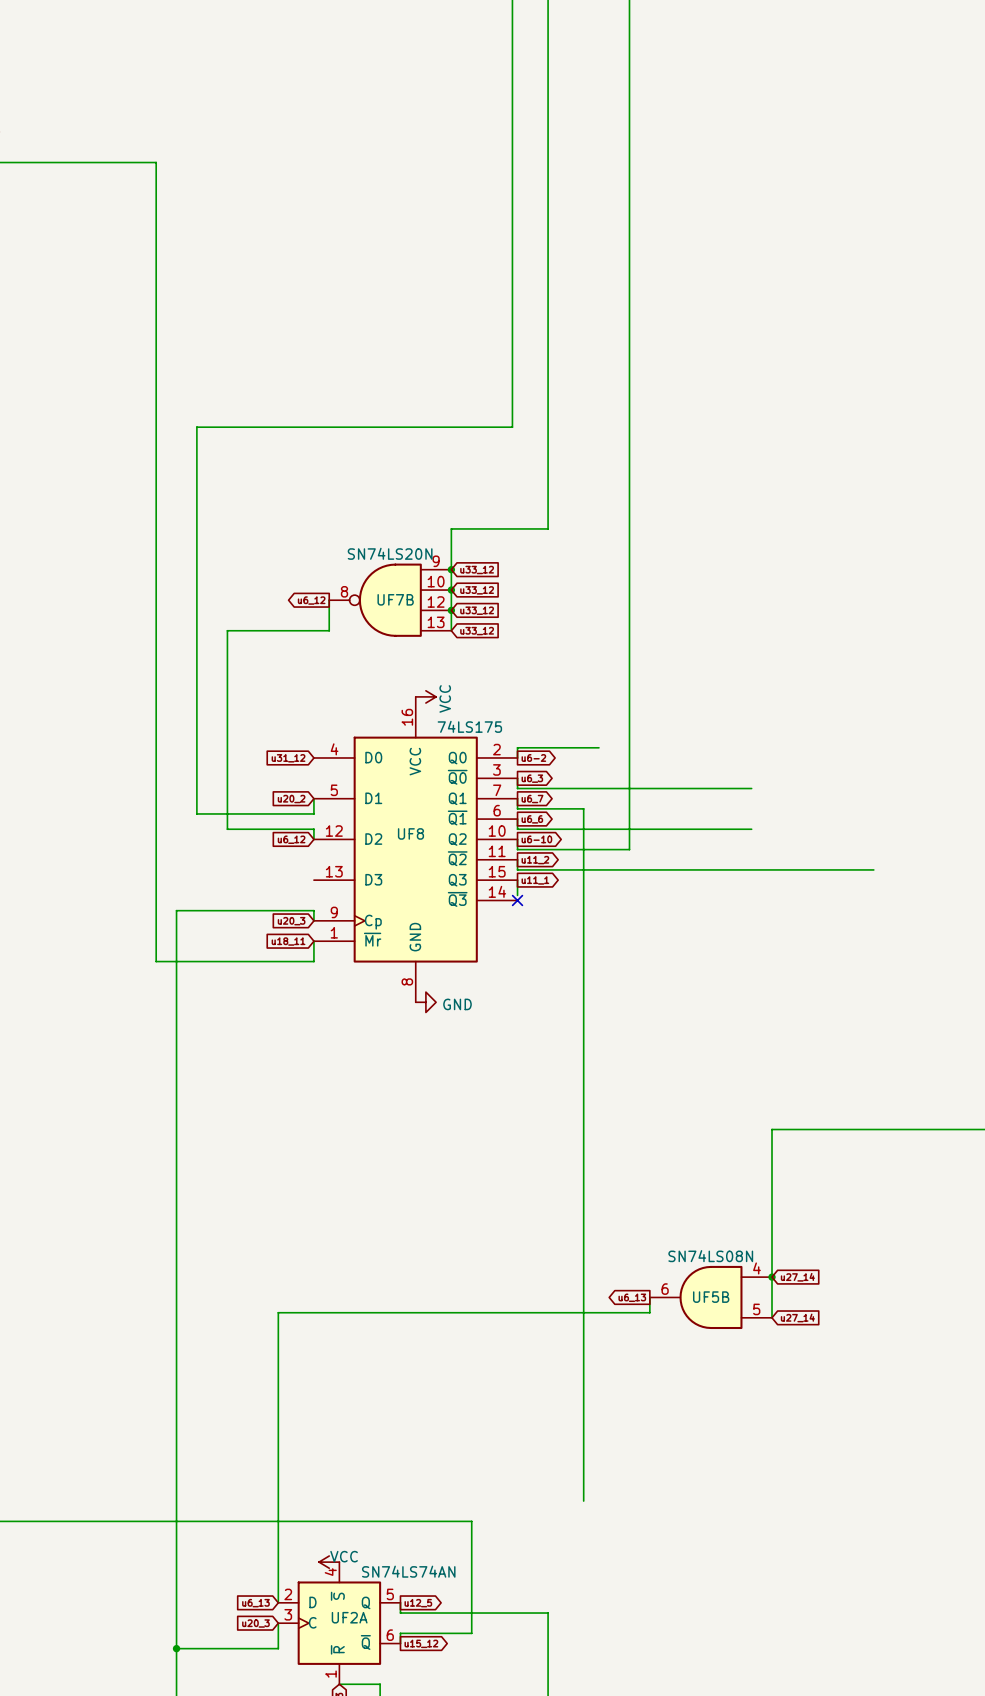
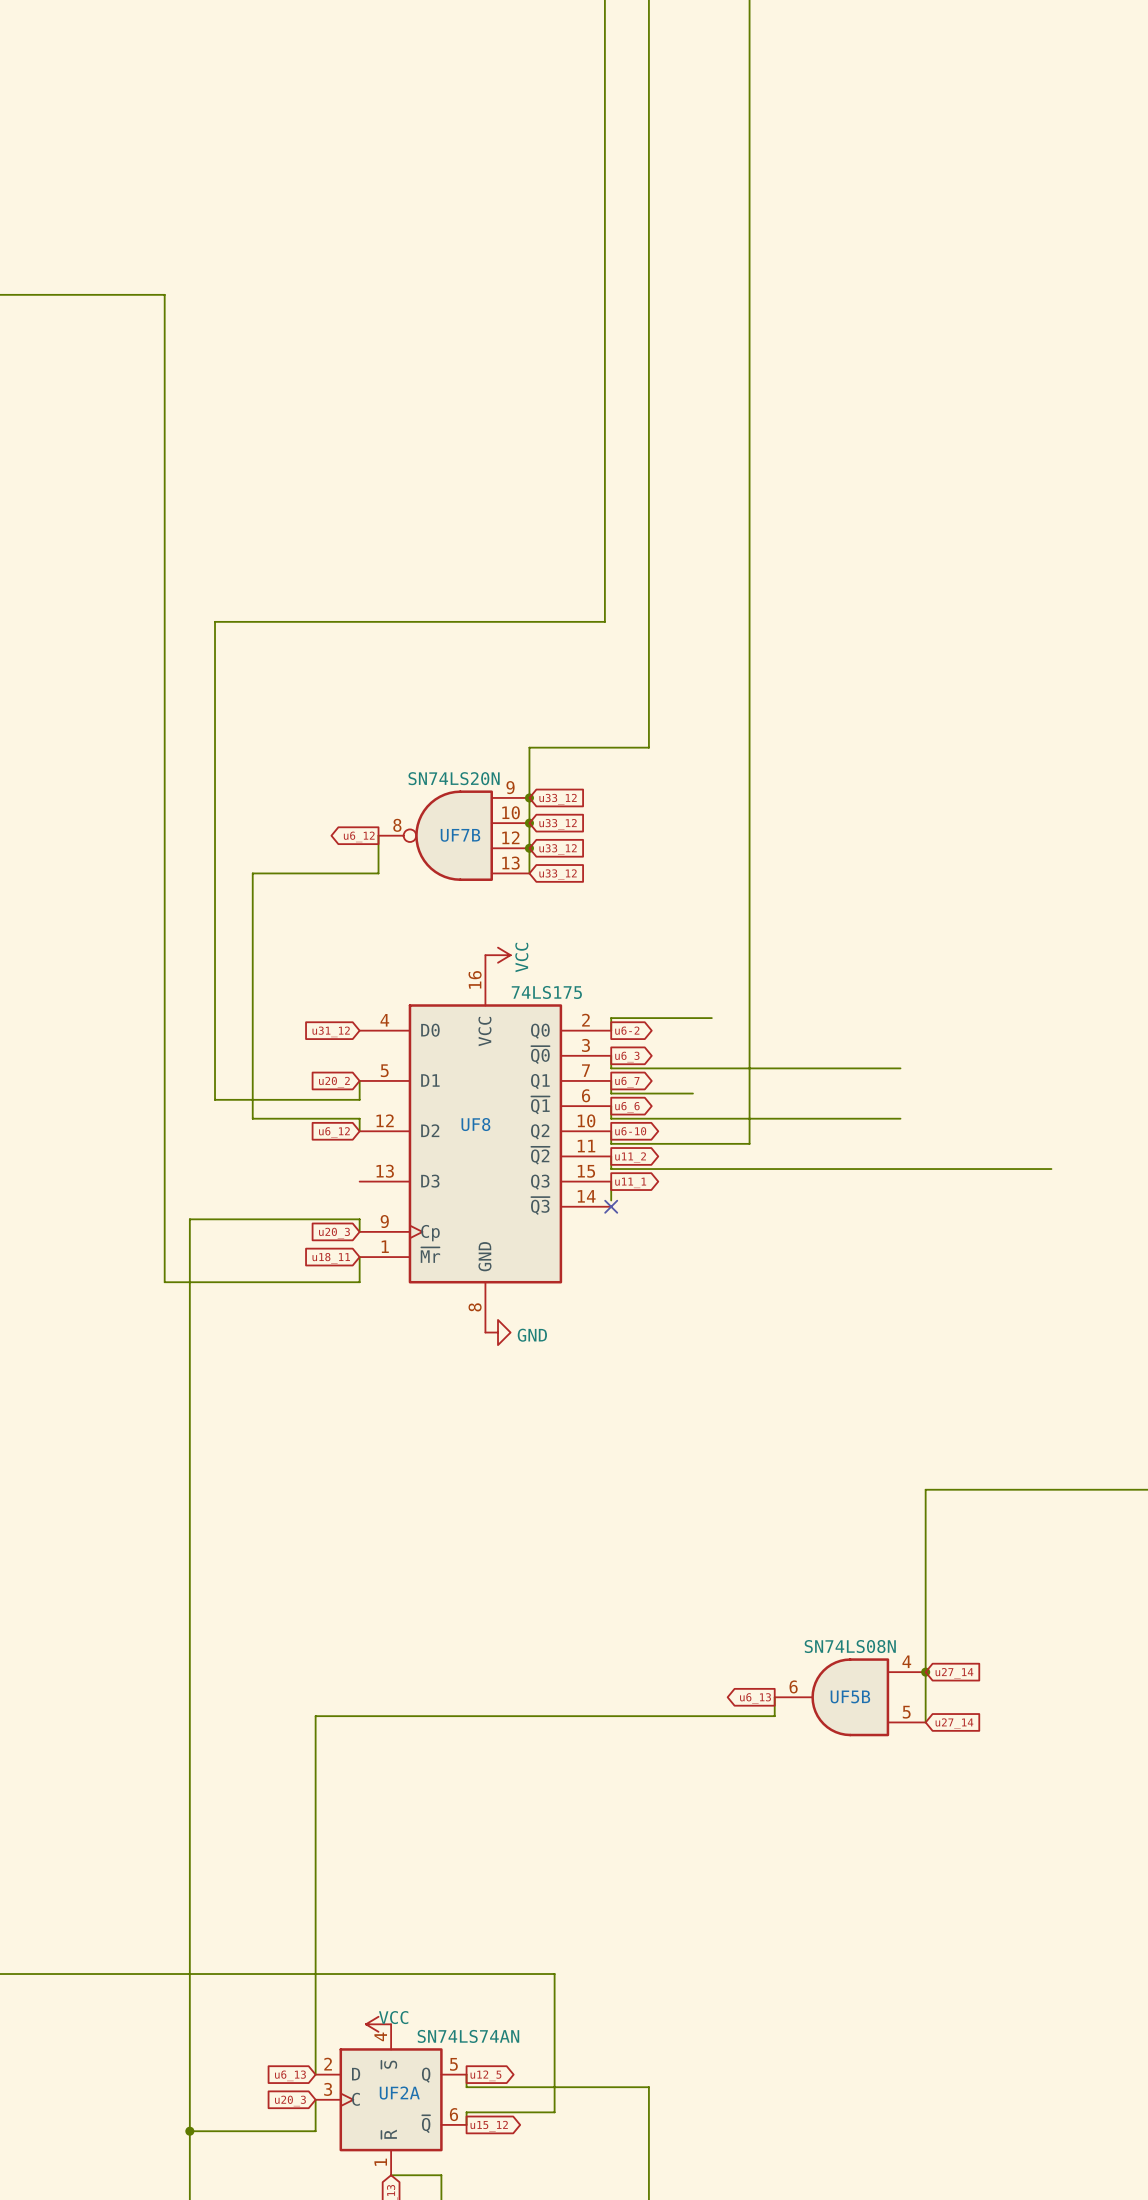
wire: (583, 808) (583, 1501) -> none

